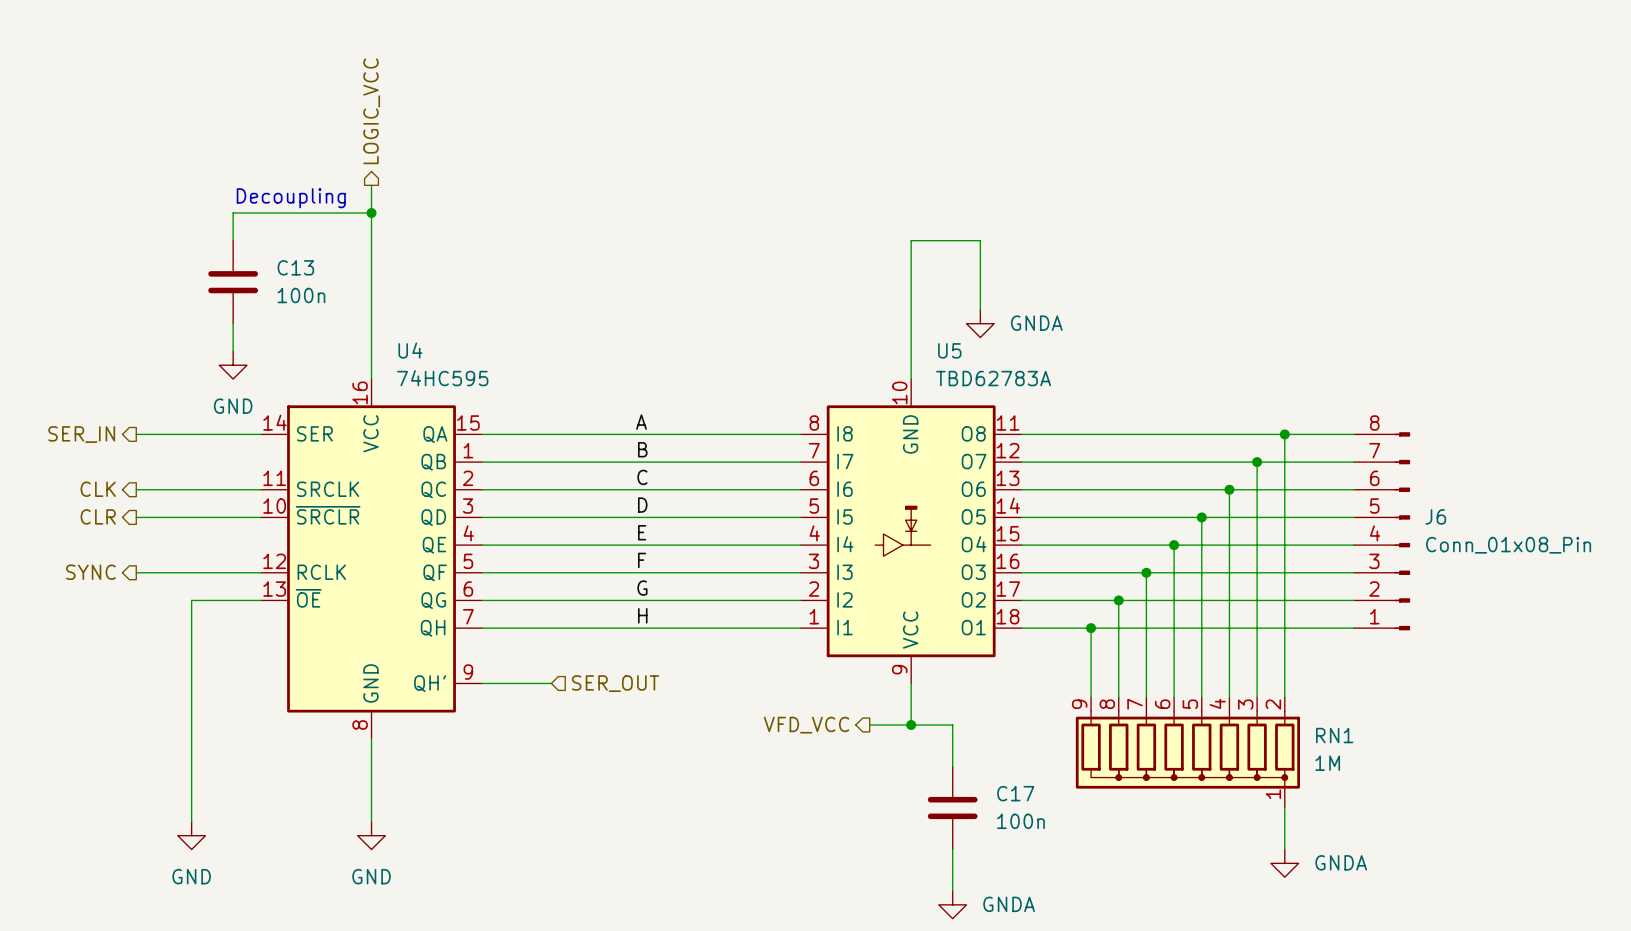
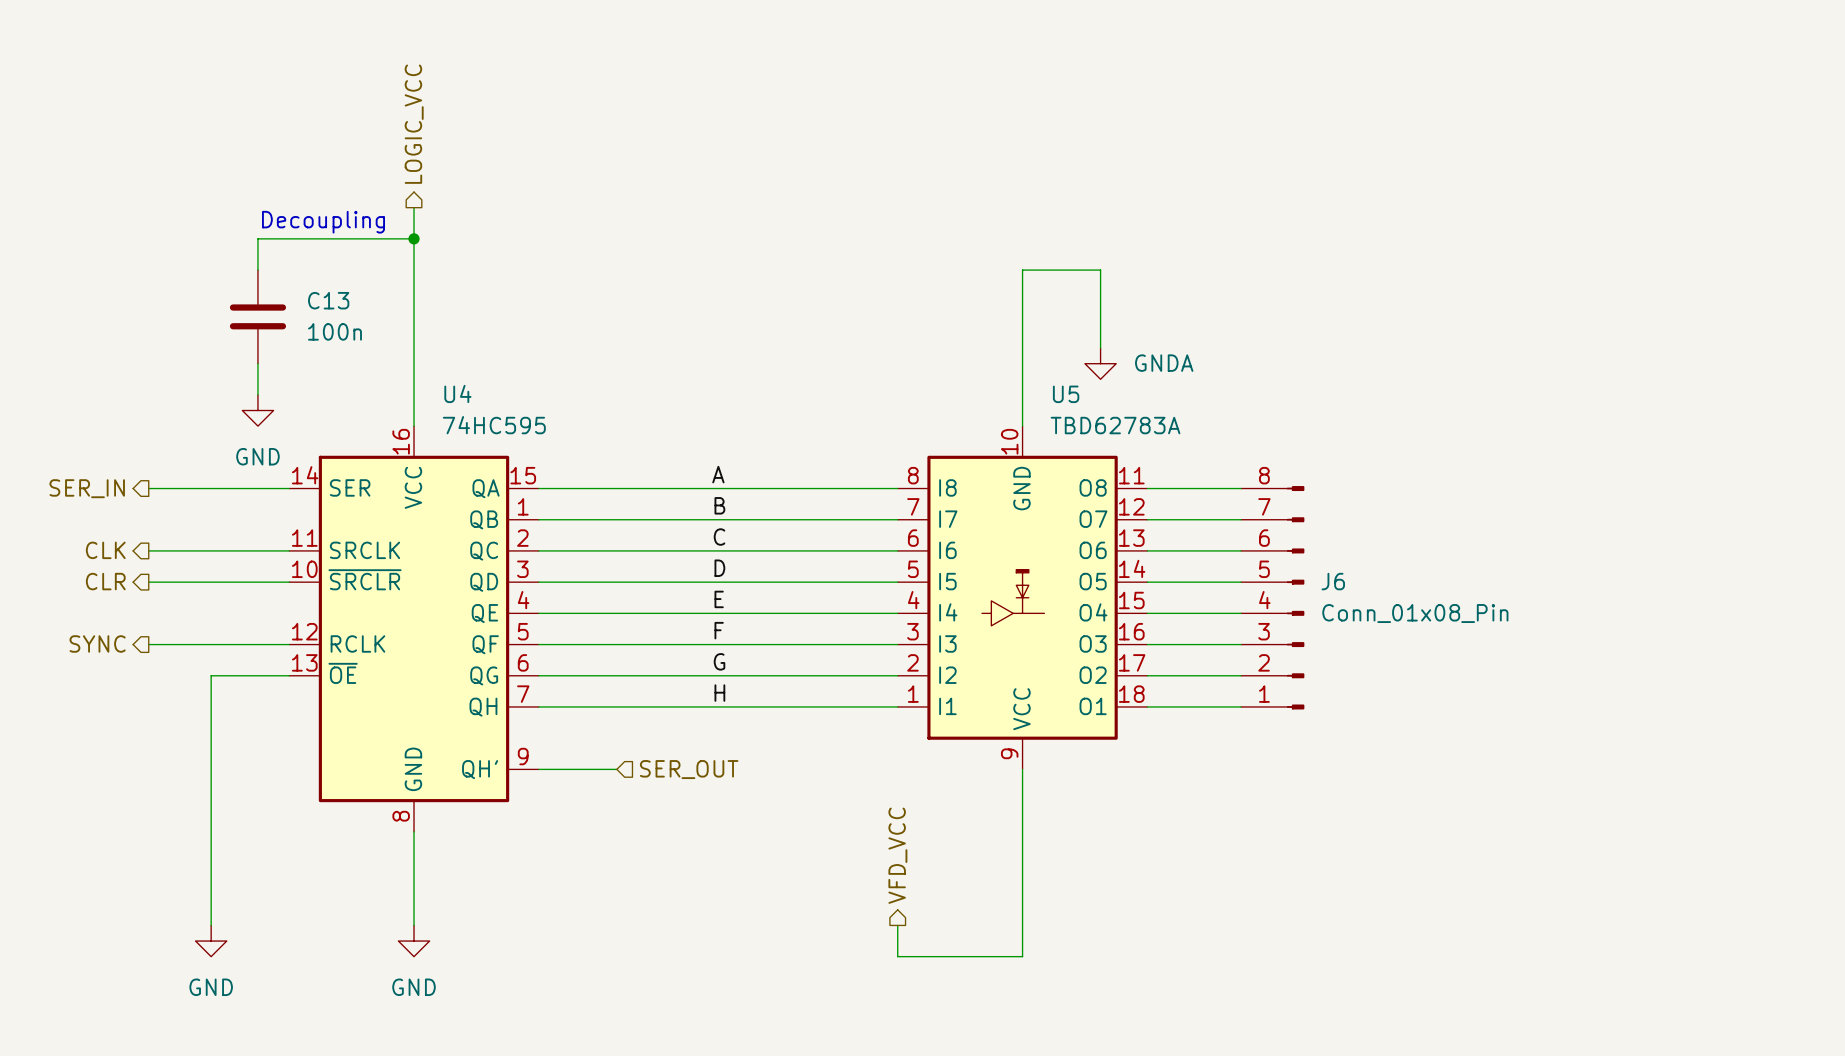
wire: (1104, 434) (1353, 434) -> none
wire: (1284, 434) (1284, 697) -> none
junction: (1284, 434) -> none
wire: (1104, 462) (1353, 462) -> none
wire: (1257, 462) (1257, 697) -> none
junction: (1257, 462) -> none
wire: (1104, 489) (1353, 489) -> none
wire: (1229, 489) (1229, 697) -> none
junction: (1229, 489) -> none
wire: (1104, 517) (1353, 517) -> none
wire: (1201, 517) (1201, 697) -> none
junction: (1201, 517) -> none
J6 position: (1382, 531) -> (1272, 597)
wire: (1104, 545) (1353, 545) -> none
wire: (1174, 545) (1174, 697) -> none
junction: (1174, 545) -> none
wire: (1104, 572) (1353, 572) -> none
wire: (1146, 572) (1146, 697) -> none
junction: (1146, 572) -> none
wire: (1104, 600) (1353, 600) -> none
wire: (1118, 600) (1118, 697) -> none
junction: (1118, 600) -> none
wire: (1091, 628) (1091, 697) -> none
junction: (1091, 628) -> none
wire: (1104, 628) (1353, 628) -> none
wire: (869, 724) (952, 724) (952, 766) -> none
wire: none -> (1022, 816) (1022, 956) (897, 956) (897, 925)
junction: (911, 724) -> none
hierarchical label rotation: 0° (806, 725) -> 90° clockwise (897, 855)
RN1: 1M (1187, 752) -> none
C17: 100n (952, 808) -> none
wire: (1284, 808) (1284, 849) -> none
wire: (952, 849) (952, 891) -> none
power symbol: GNDA (1284, 863) -> none
power symbol: GNDA (952, 904) -> none

